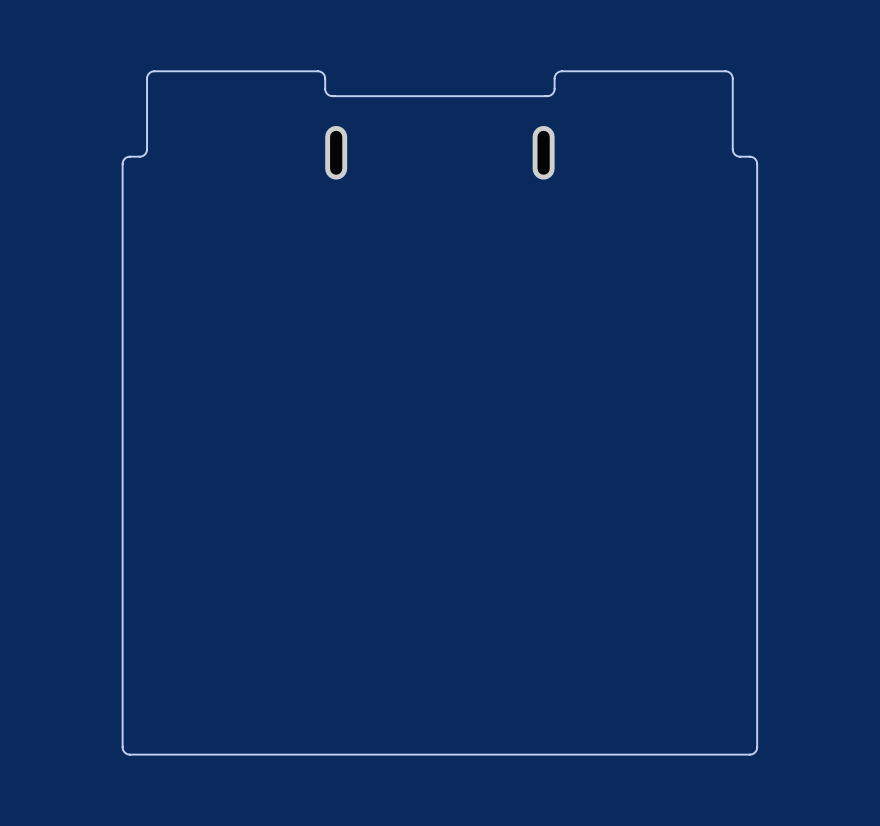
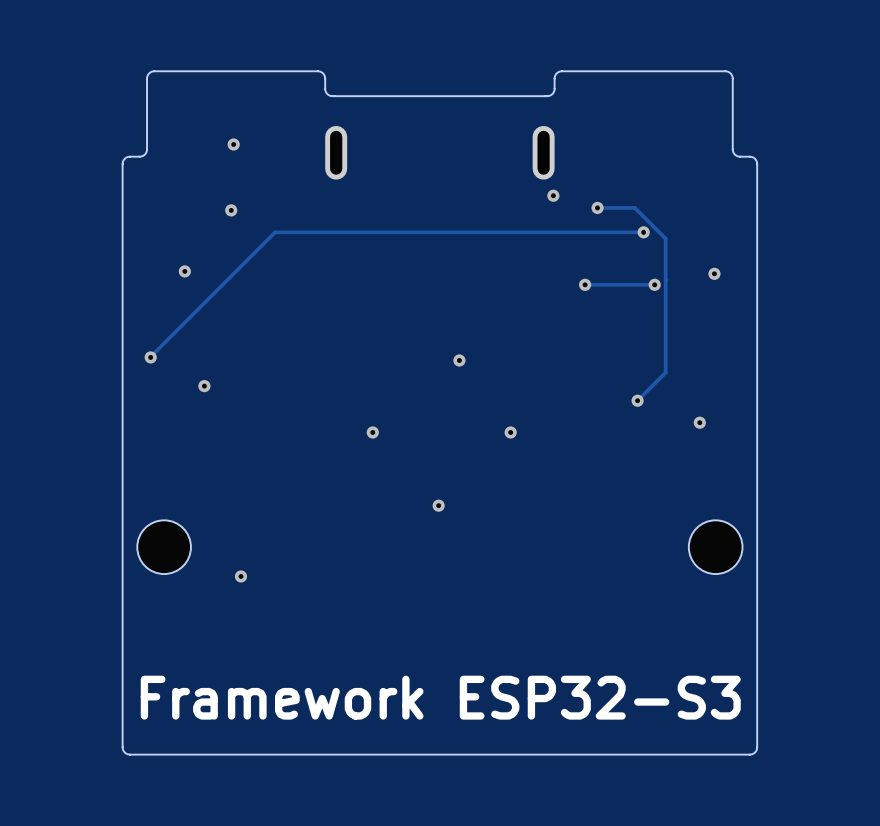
via: none -> (233, 144)
via: none -> (553, 195)
track: none -> (597, 207) (634, 207) (665, 238) (665, 372) (637, 400)
via: none -> (597, 207)
via: none -> (231, 210)
track: none -> (643, 232) (275, 232) (150, 357)
via: none -> (643, 232)
via: none -> (184, 271)
via: none -> (714, 273)
via: none -> (585, 284)
track: none -> (654, 284) (585, 284)
via: none -> (654, 284)
via: none -> (150, 357)
via: none -> (459, 360)
via: none -> (204, 386)
via: none -> (637, 400)
via: none -> (699, 422)
via: none -> (372, 432)
via: none -> (510, 432)
via: none -> (438, 505)
part: none -> (164, 547)
part: none -> (715, 547)
via: none -> (240, 576)
text: none -> Framework ESP32-S3 (440, 697)

